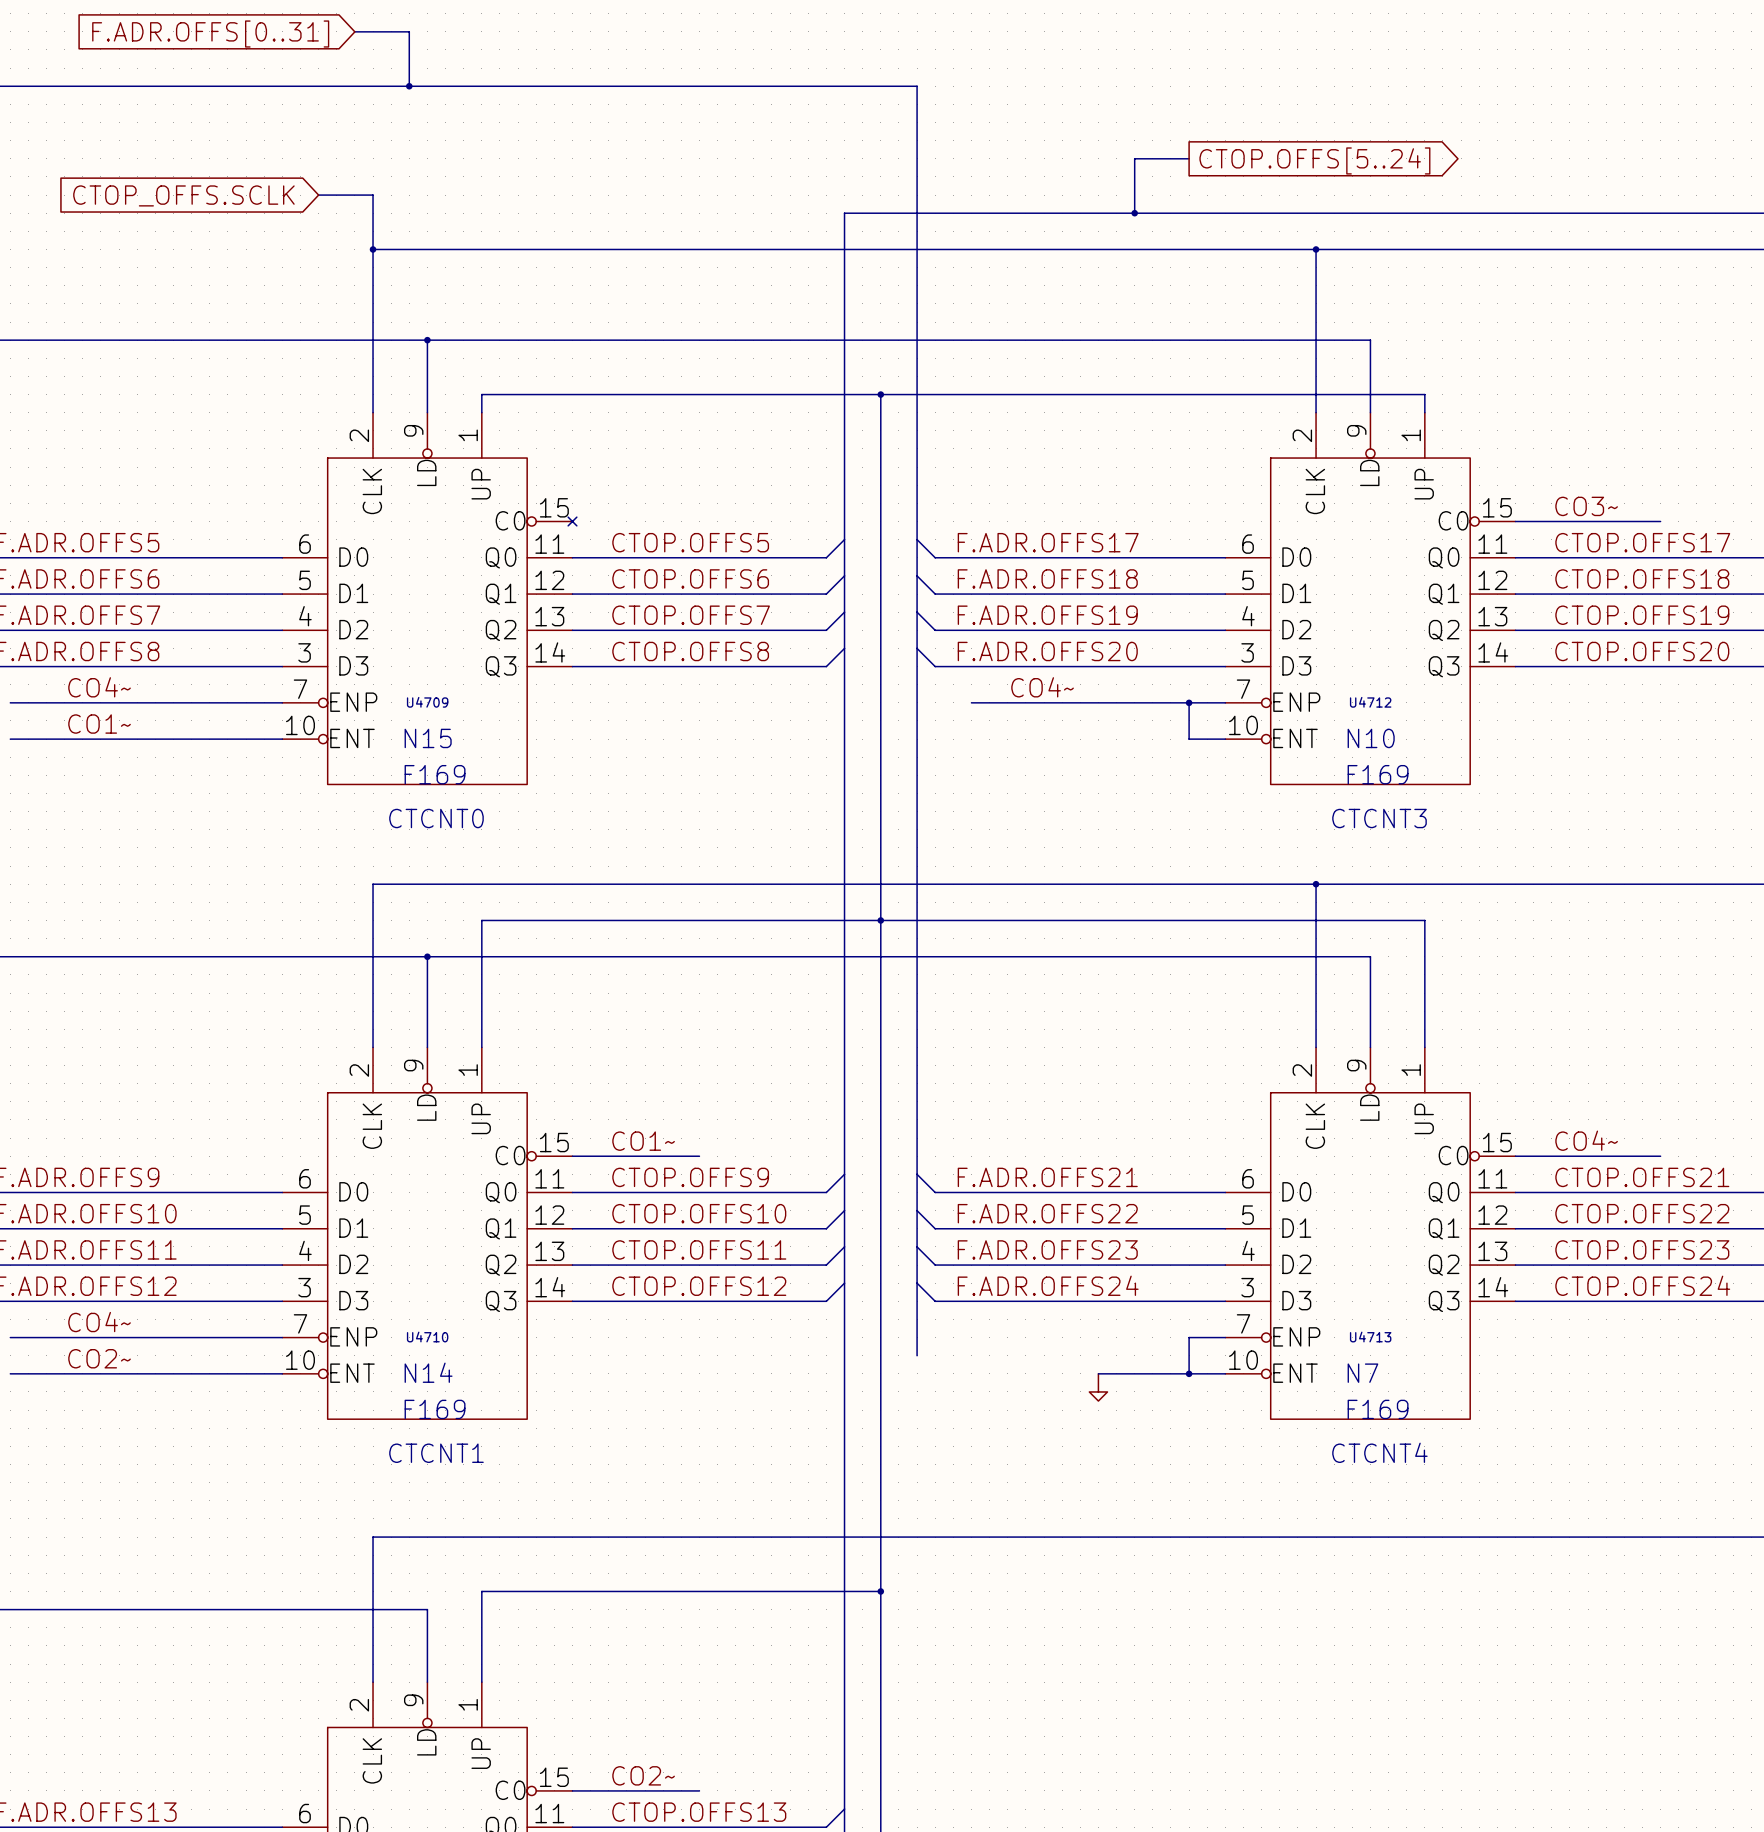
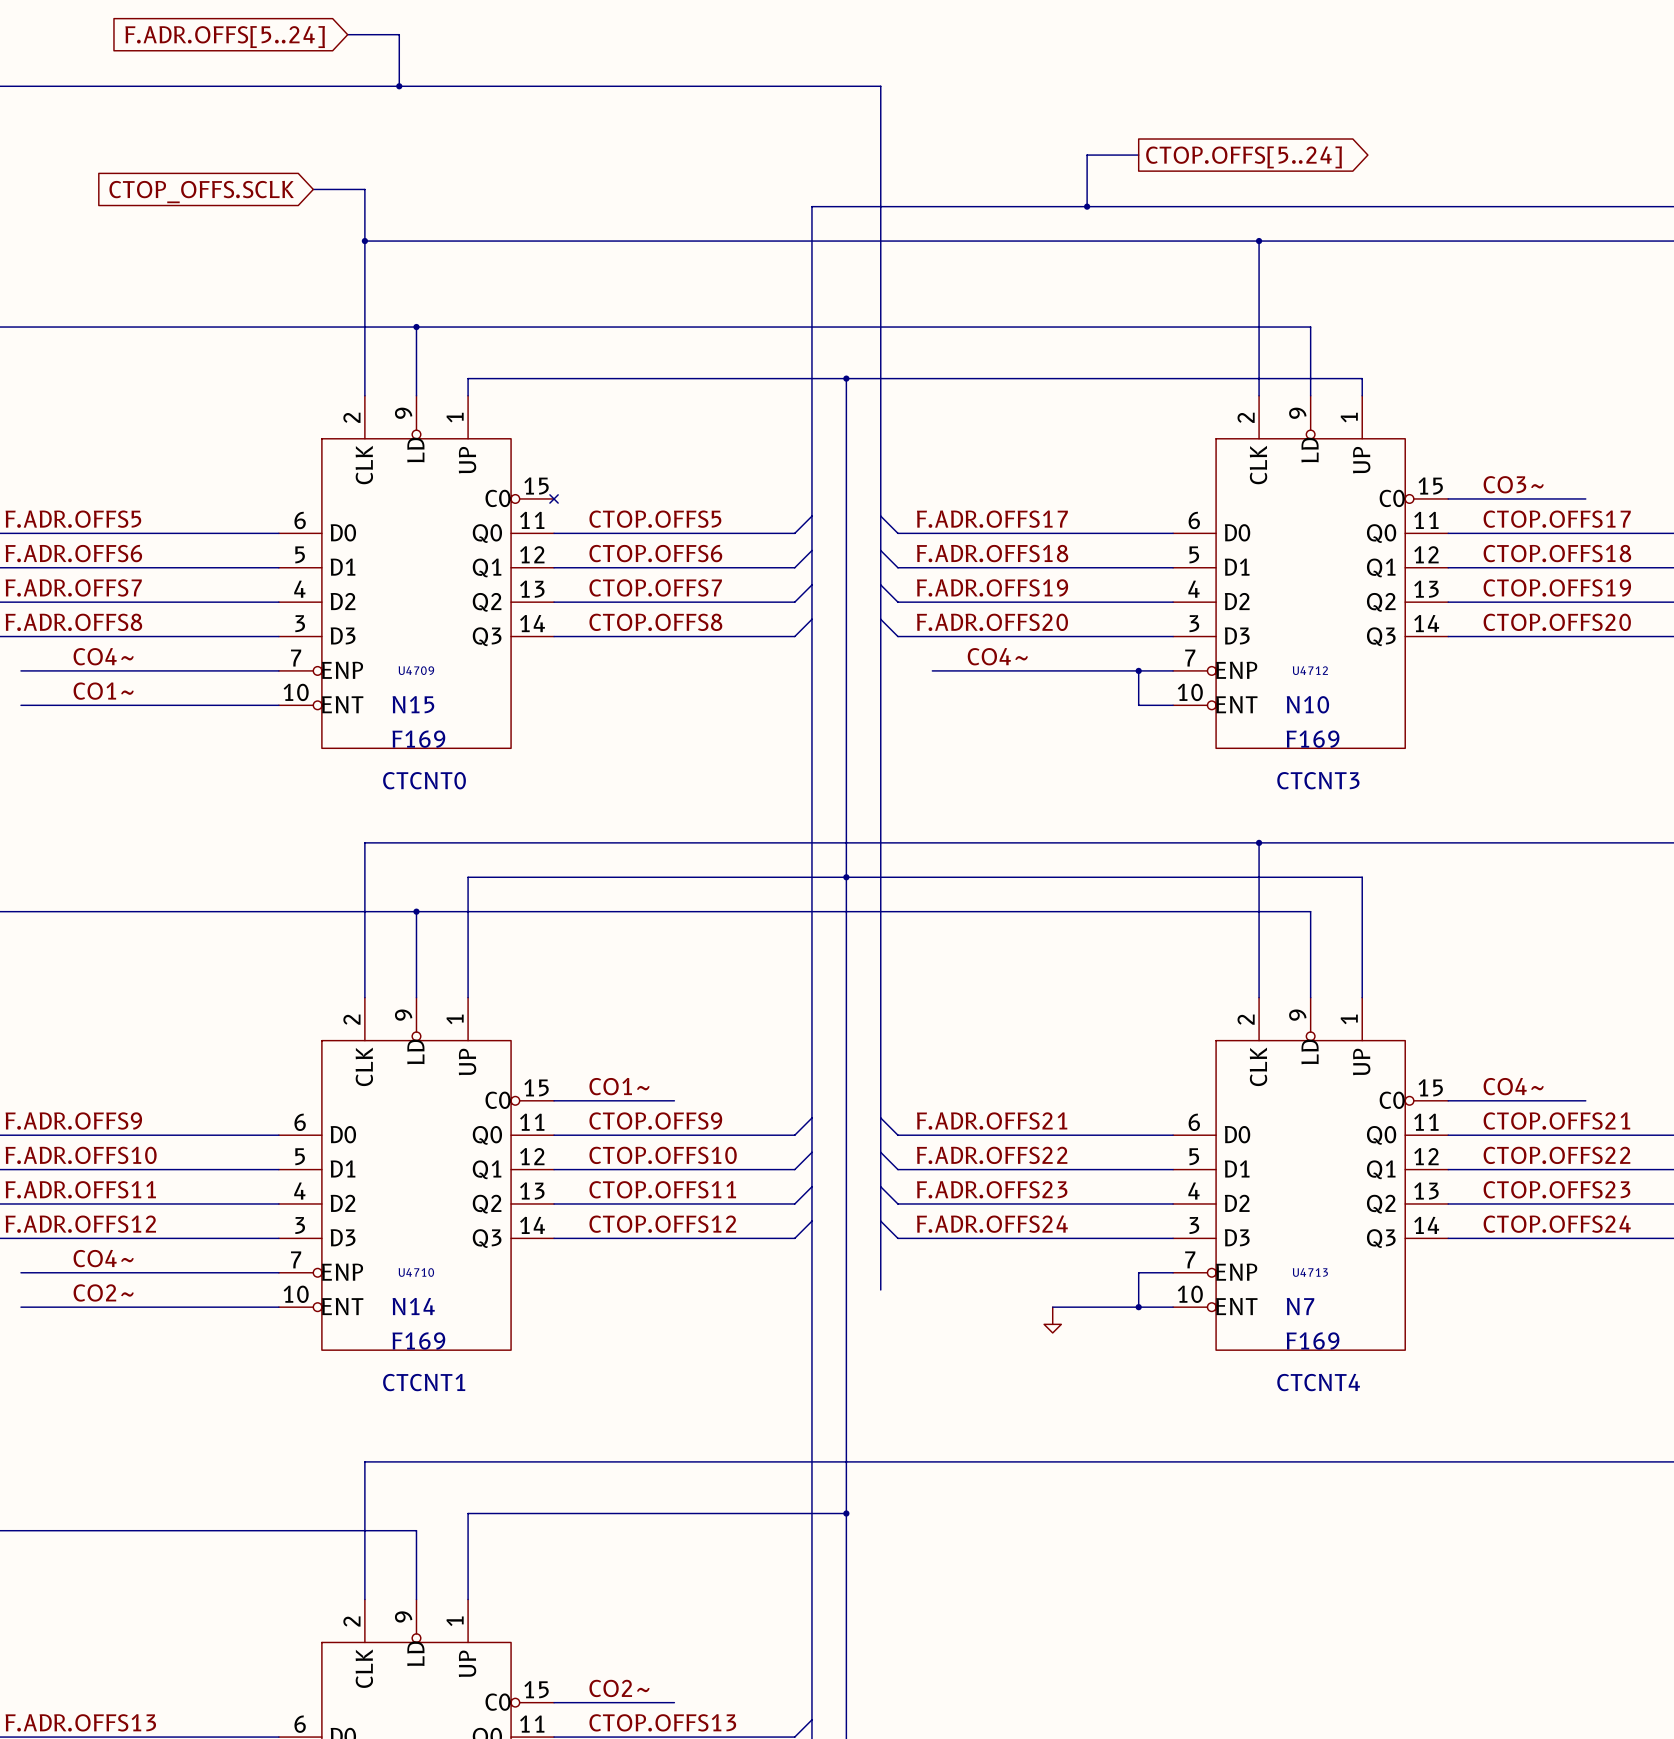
global label: F.ADR.OFFS[0..31] (210, 34) -> F.ADR.OFFS[5..24] (225, 37)

